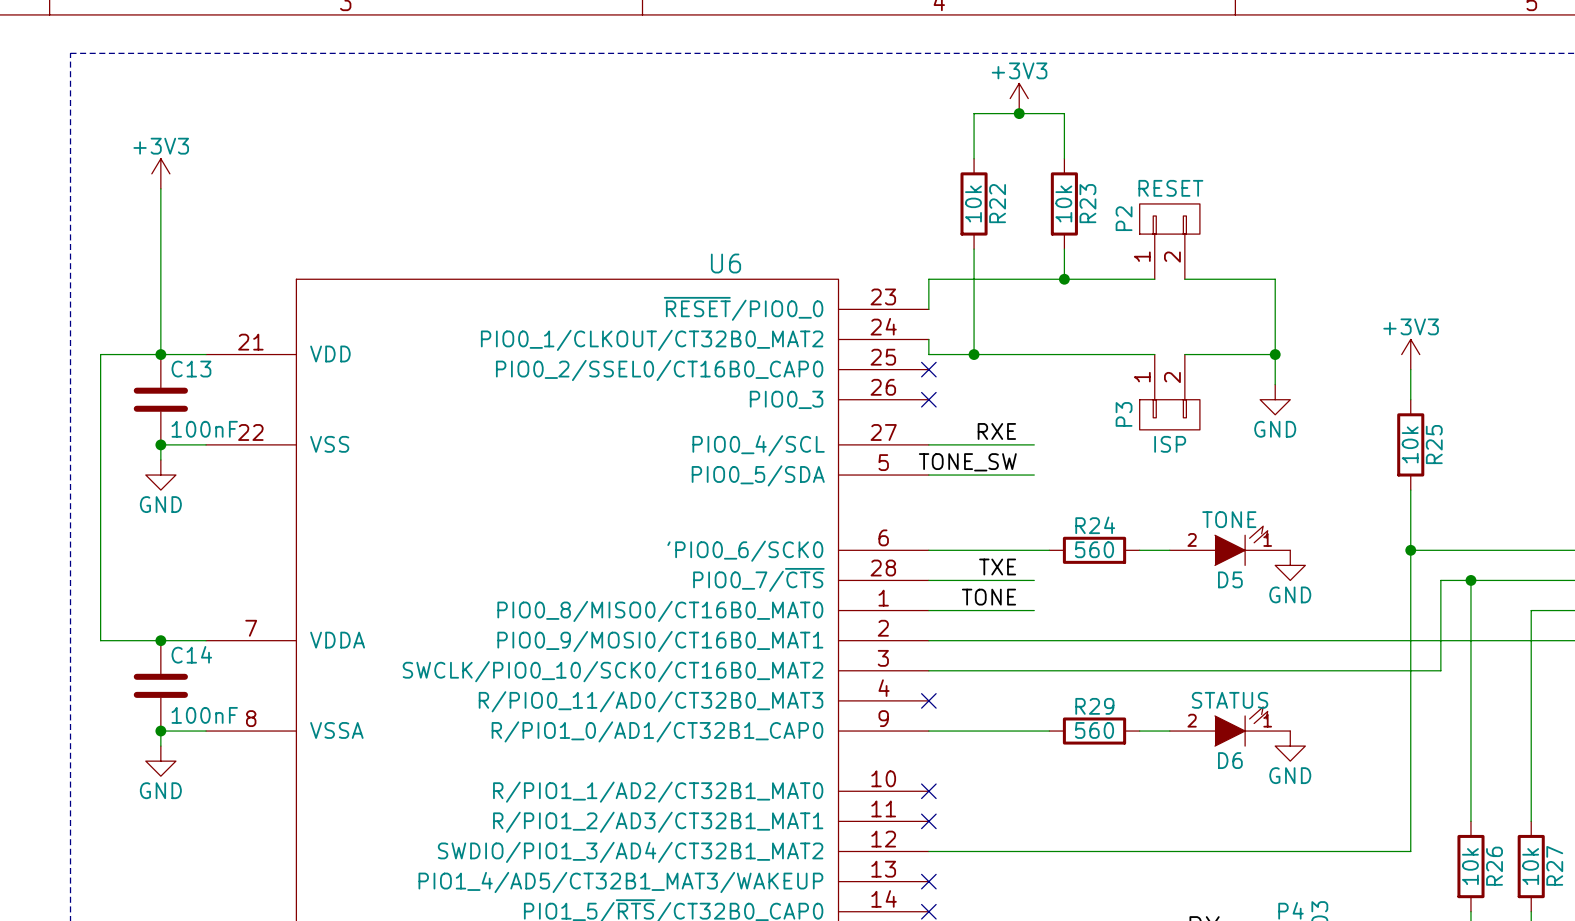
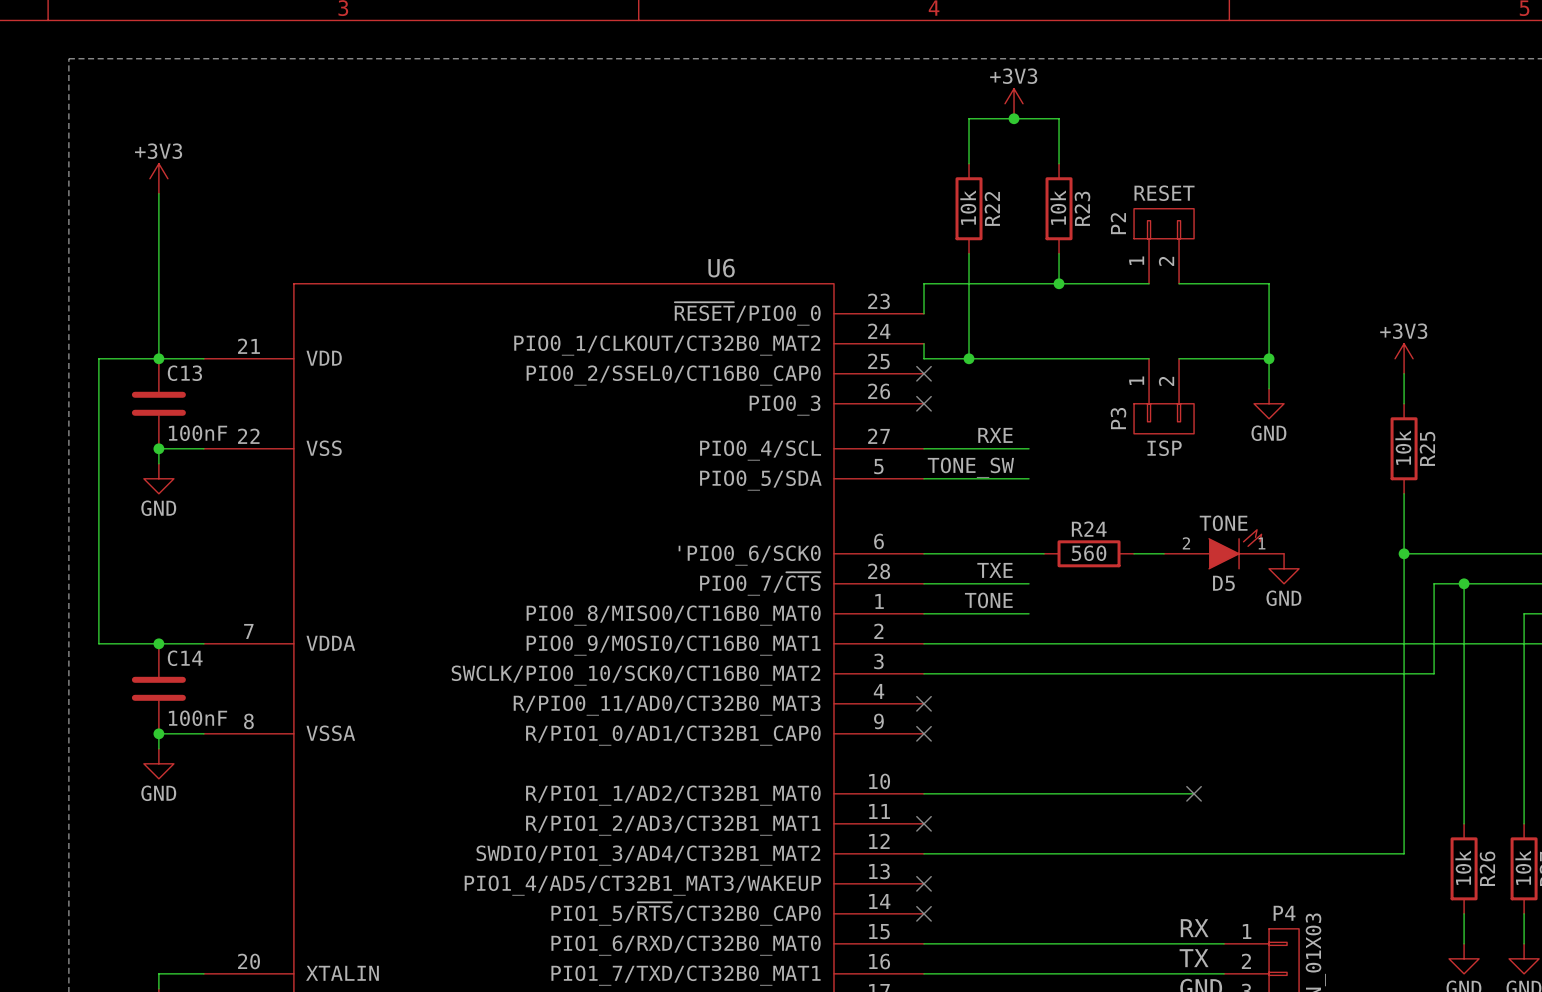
D6: STATUS (1230, 726) -> none
wire: (928, 731) (1049, 731) -> none
R29: 560 (1094, 731) -> none
wire: (1139, 731) (1169, 731) -> none
power symbol: GND (1290, 746) -> none
wire: none -> (924, 793) (1194, 793)
no-connect mark position: (928, 791) -> (924, 733)
no-connect mark: none -> (1194, 793)

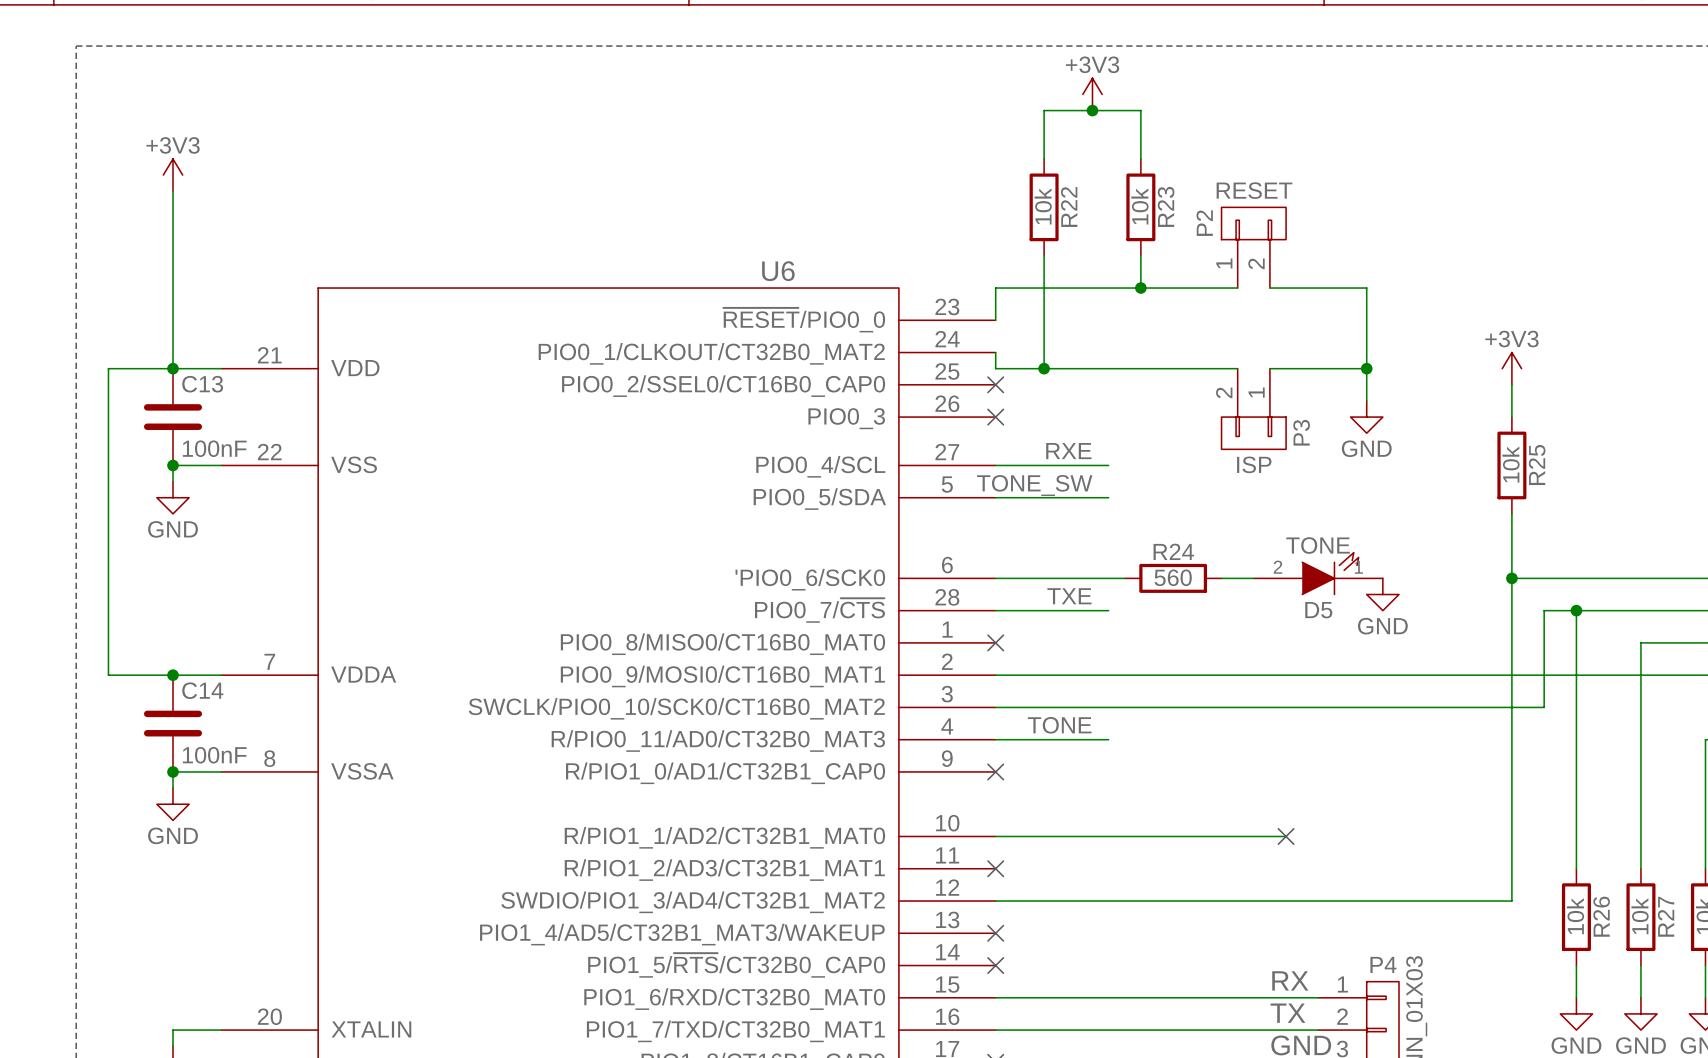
P3 flip: as is (1164, 418) -> left-right (1253, 433)
label position: TONE (988, 600) -> TONE (1059, 725)
wire: (924, 613) (1029, 613) -> (995, 739) (1108, 739)
no-connect mark: none -> (995, 642)
no-connect mark: (924, 703) -> none

